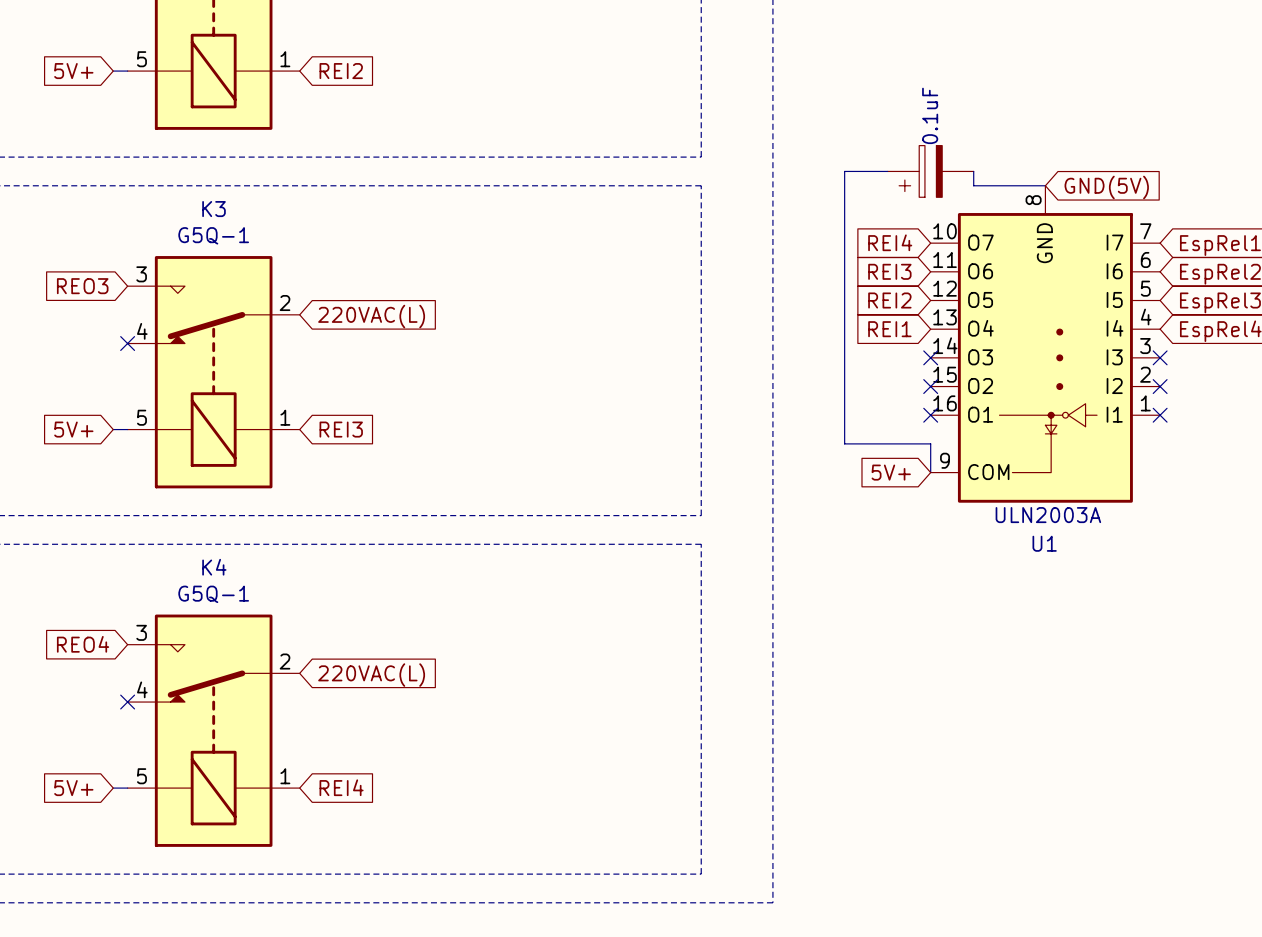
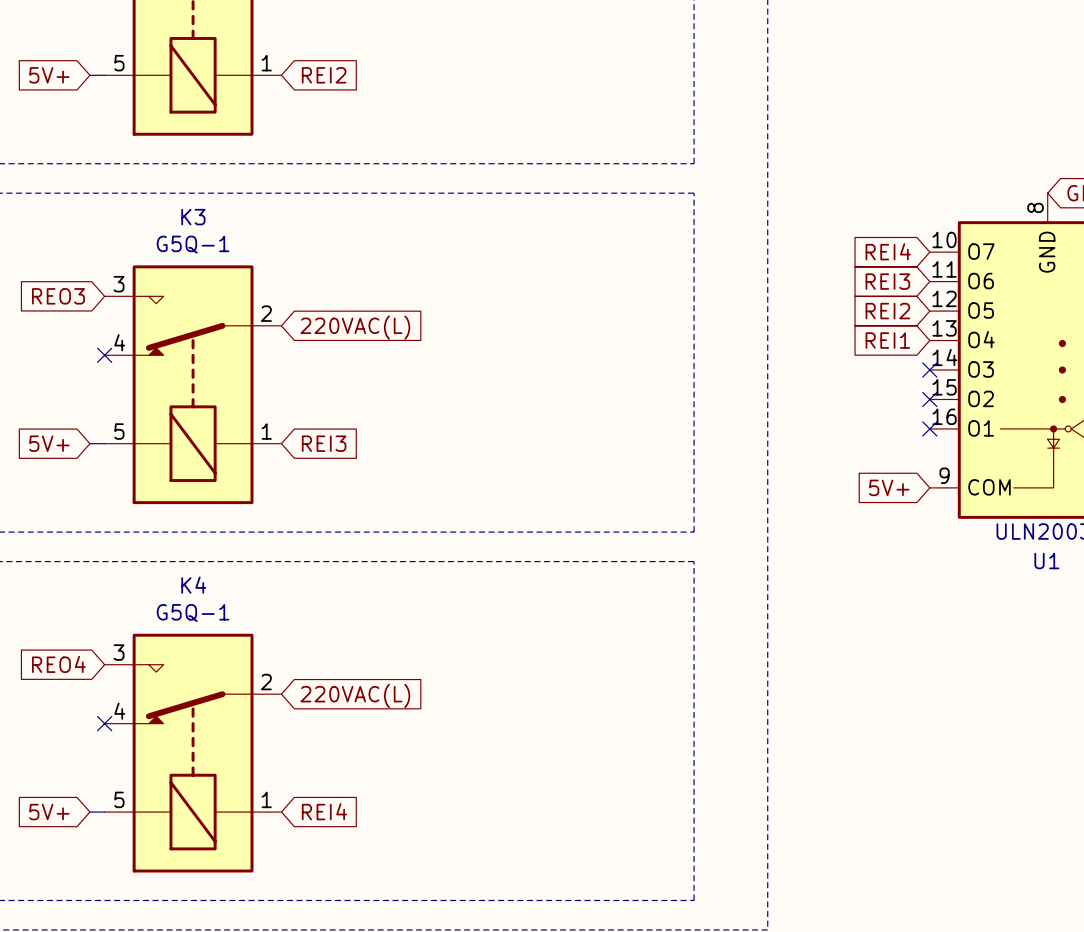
wire: (887, 171) (844, 171) (844, 443) (930, 443) (930, 472) -> none
part: 0.1uF (930, 171) -> none
wire: (973, 171) (973, 185) (1045, 185) -> none

